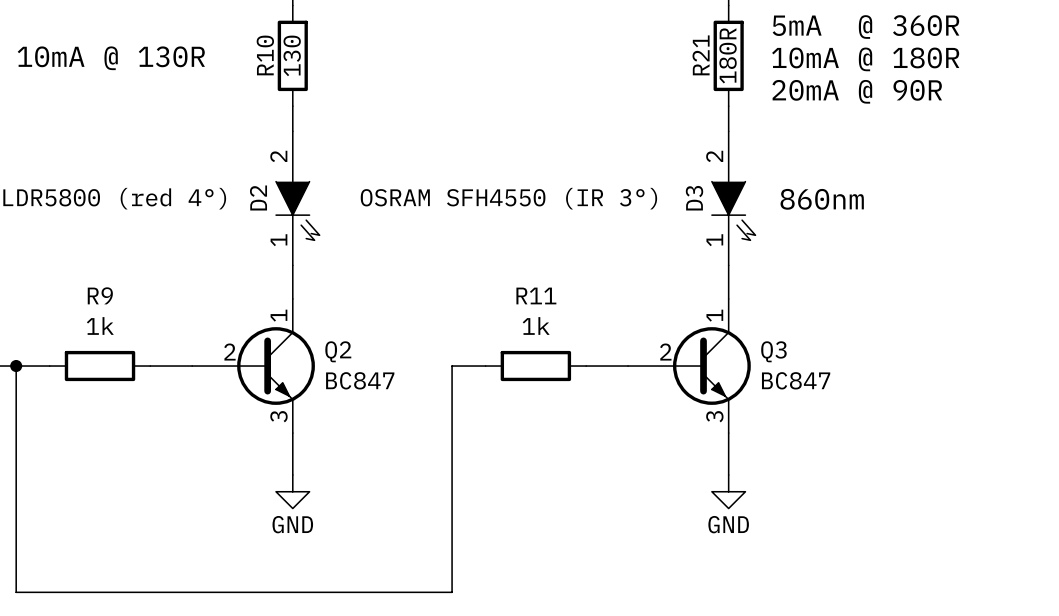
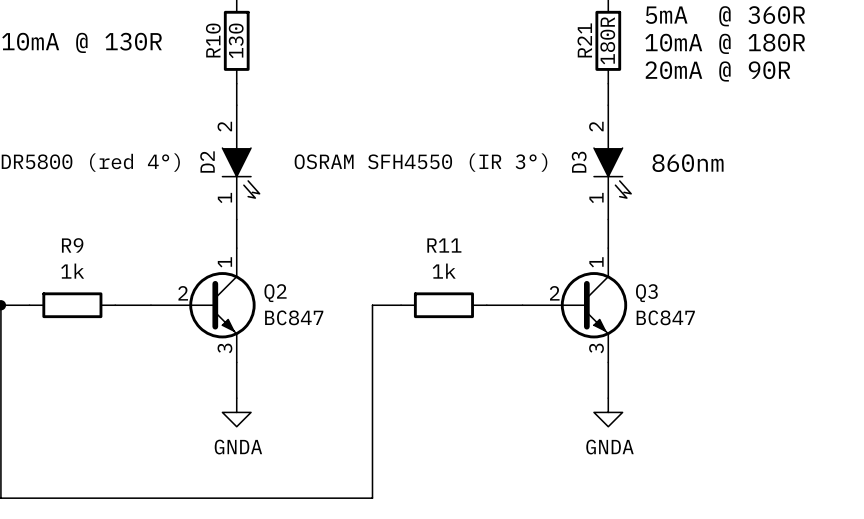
power symbol: GND (292, 491) -> GNDA (236, 412)
power symbol: GND (728, 491) -> GNDA (608, 412)

